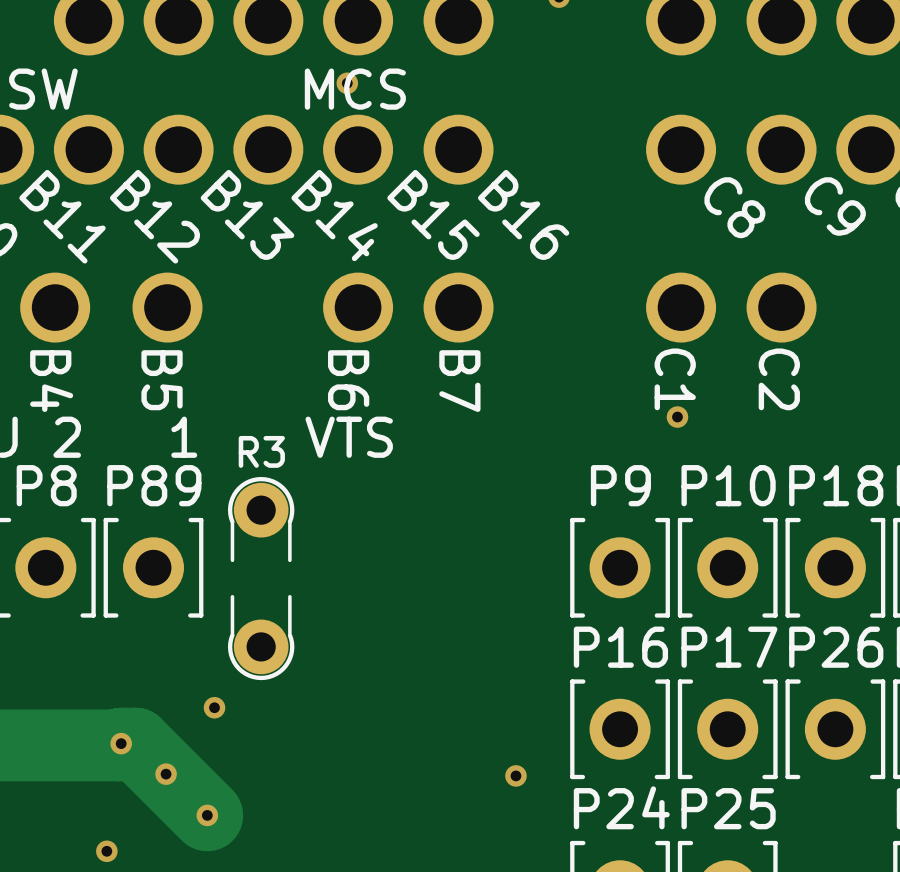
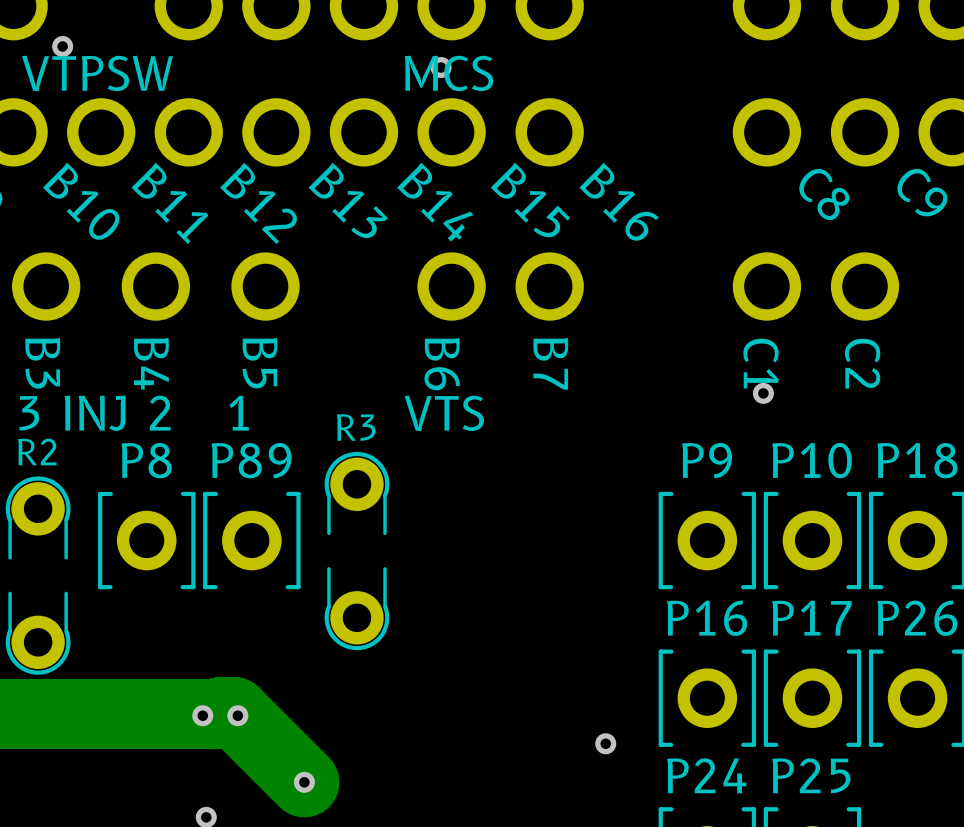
via: (214, 707) -> none
via: (121, 743) -> none
via: none -> (202, 715)
via: none -> (237, 715)
via: (166, 774) -> none

